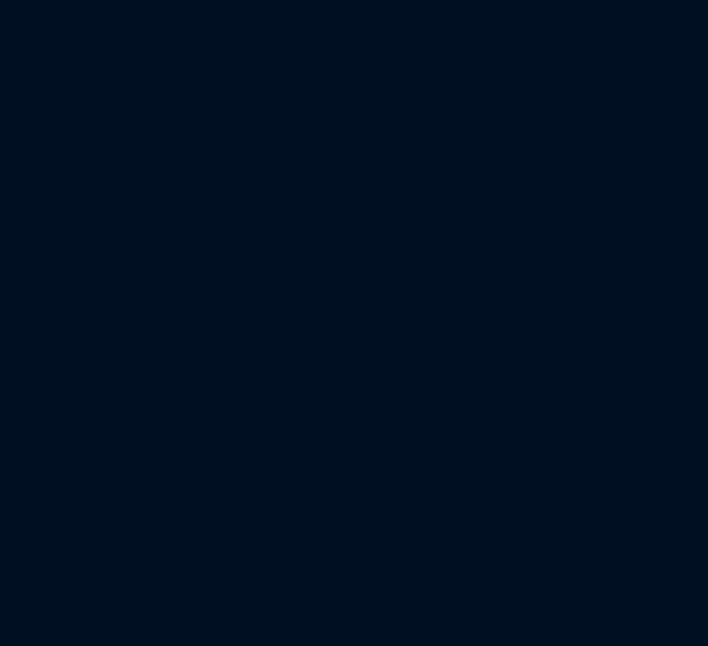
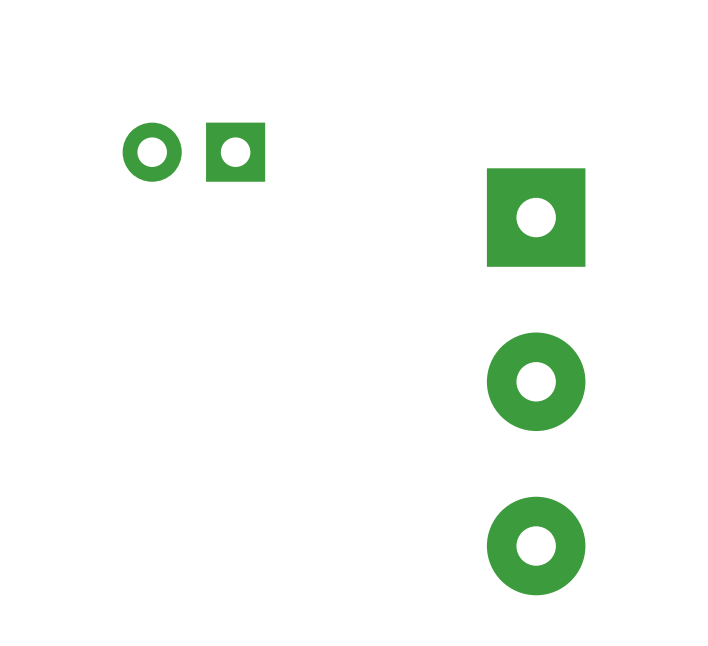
part: none -> (193, 152)
part: none -> (536, 381)

